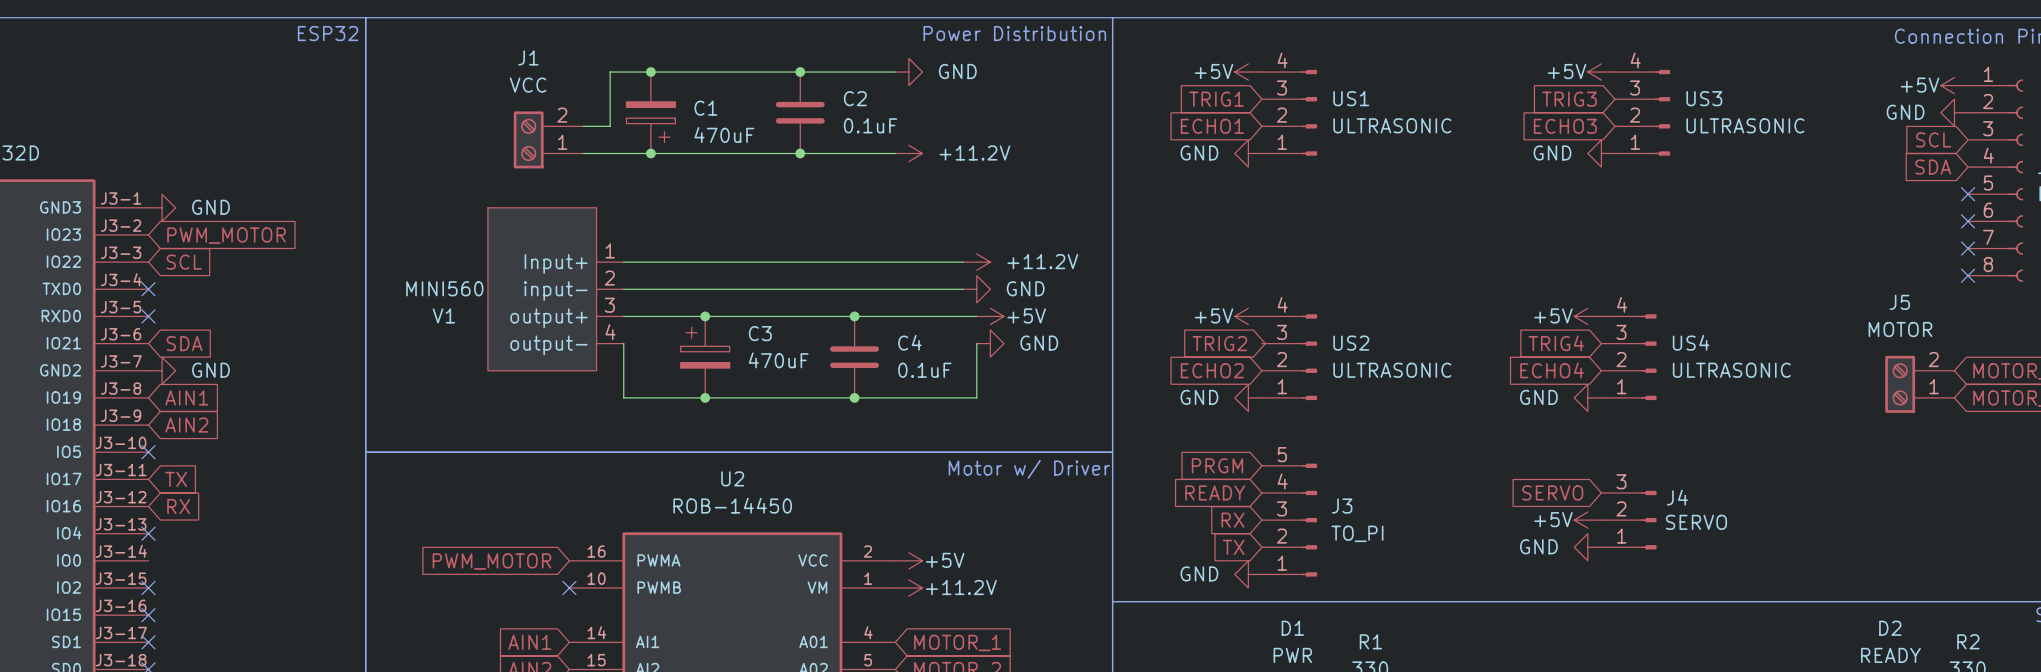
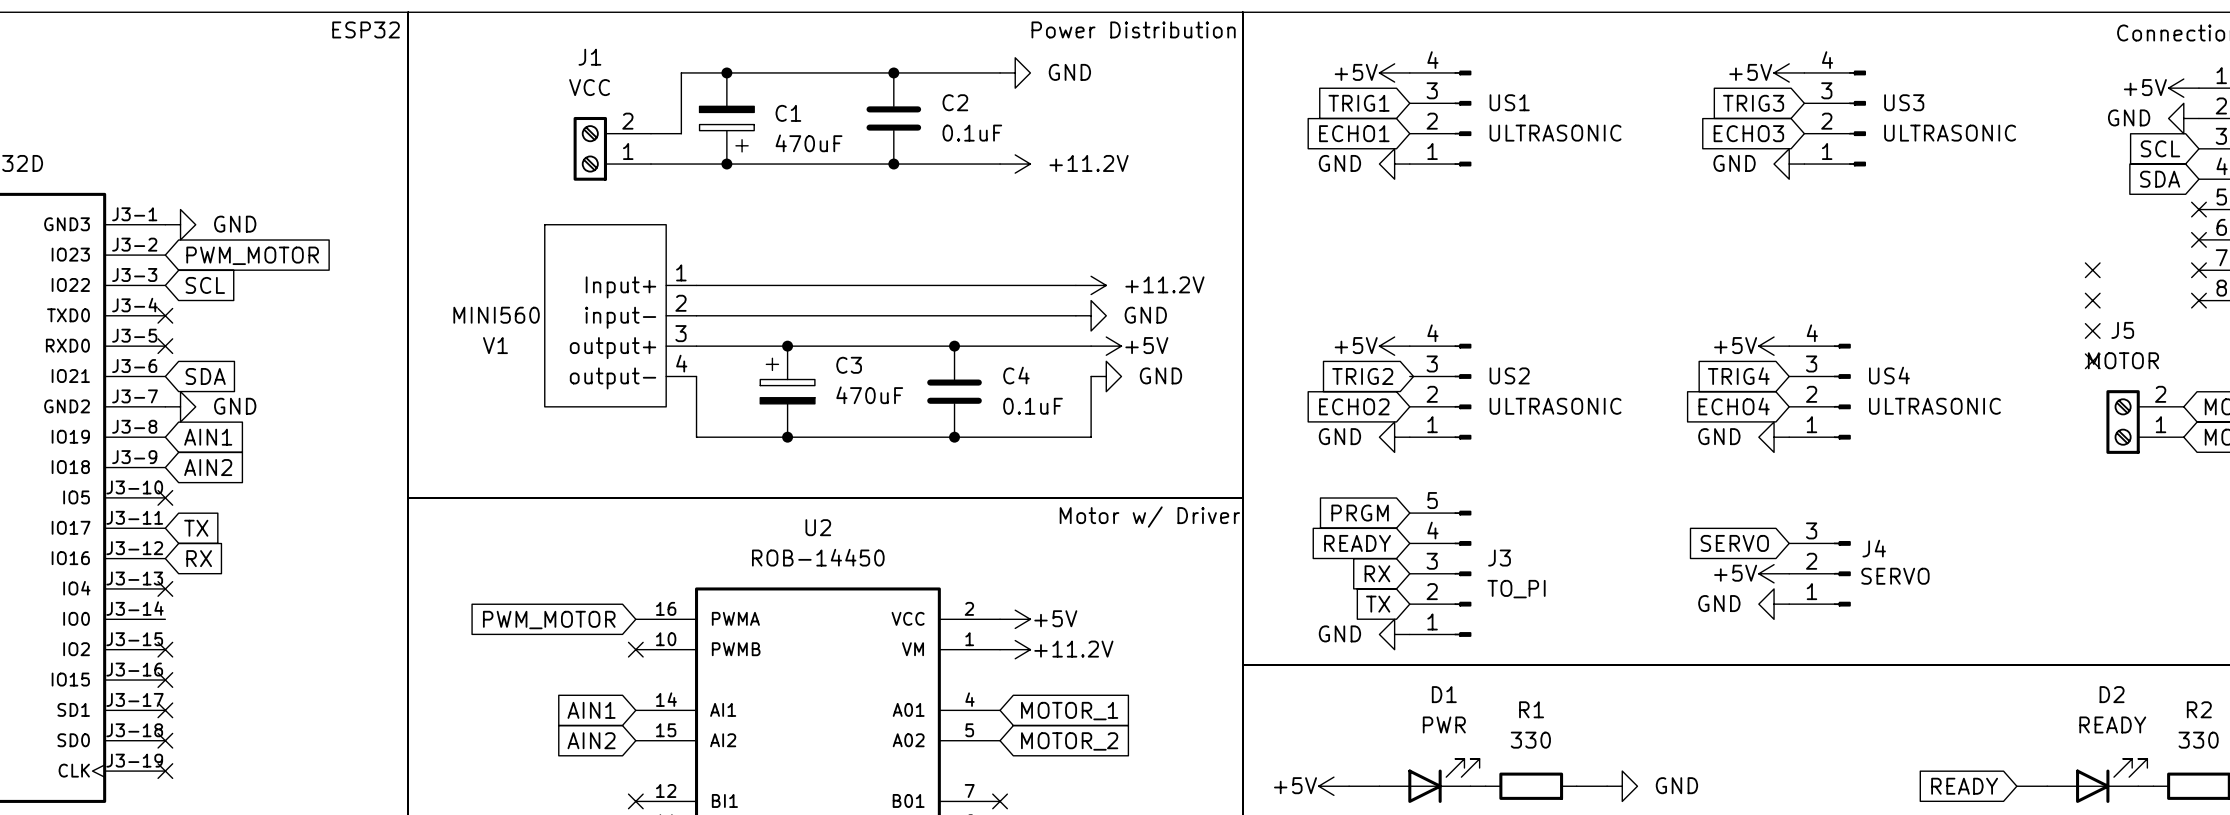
no-connect mark: none -> (2092, 270)
no-connect mark: none -> (2092, 300)
no-connect mark: none -> (2092, 330)
no-connect mark: none -> (2092, 361)

